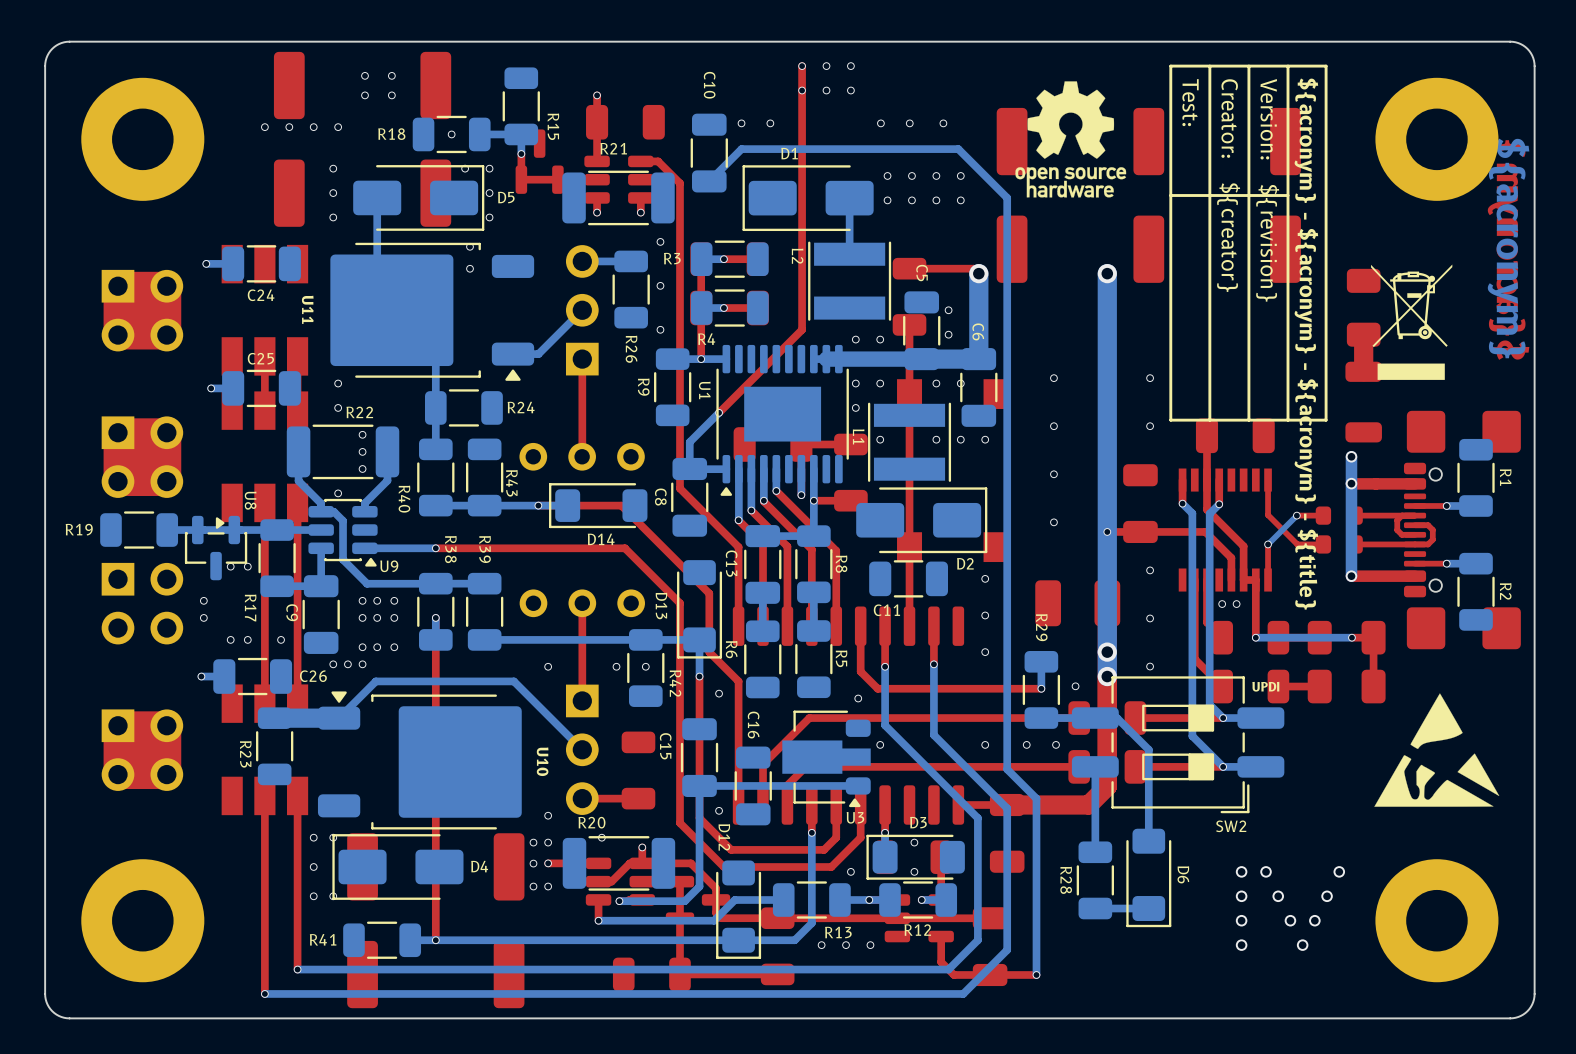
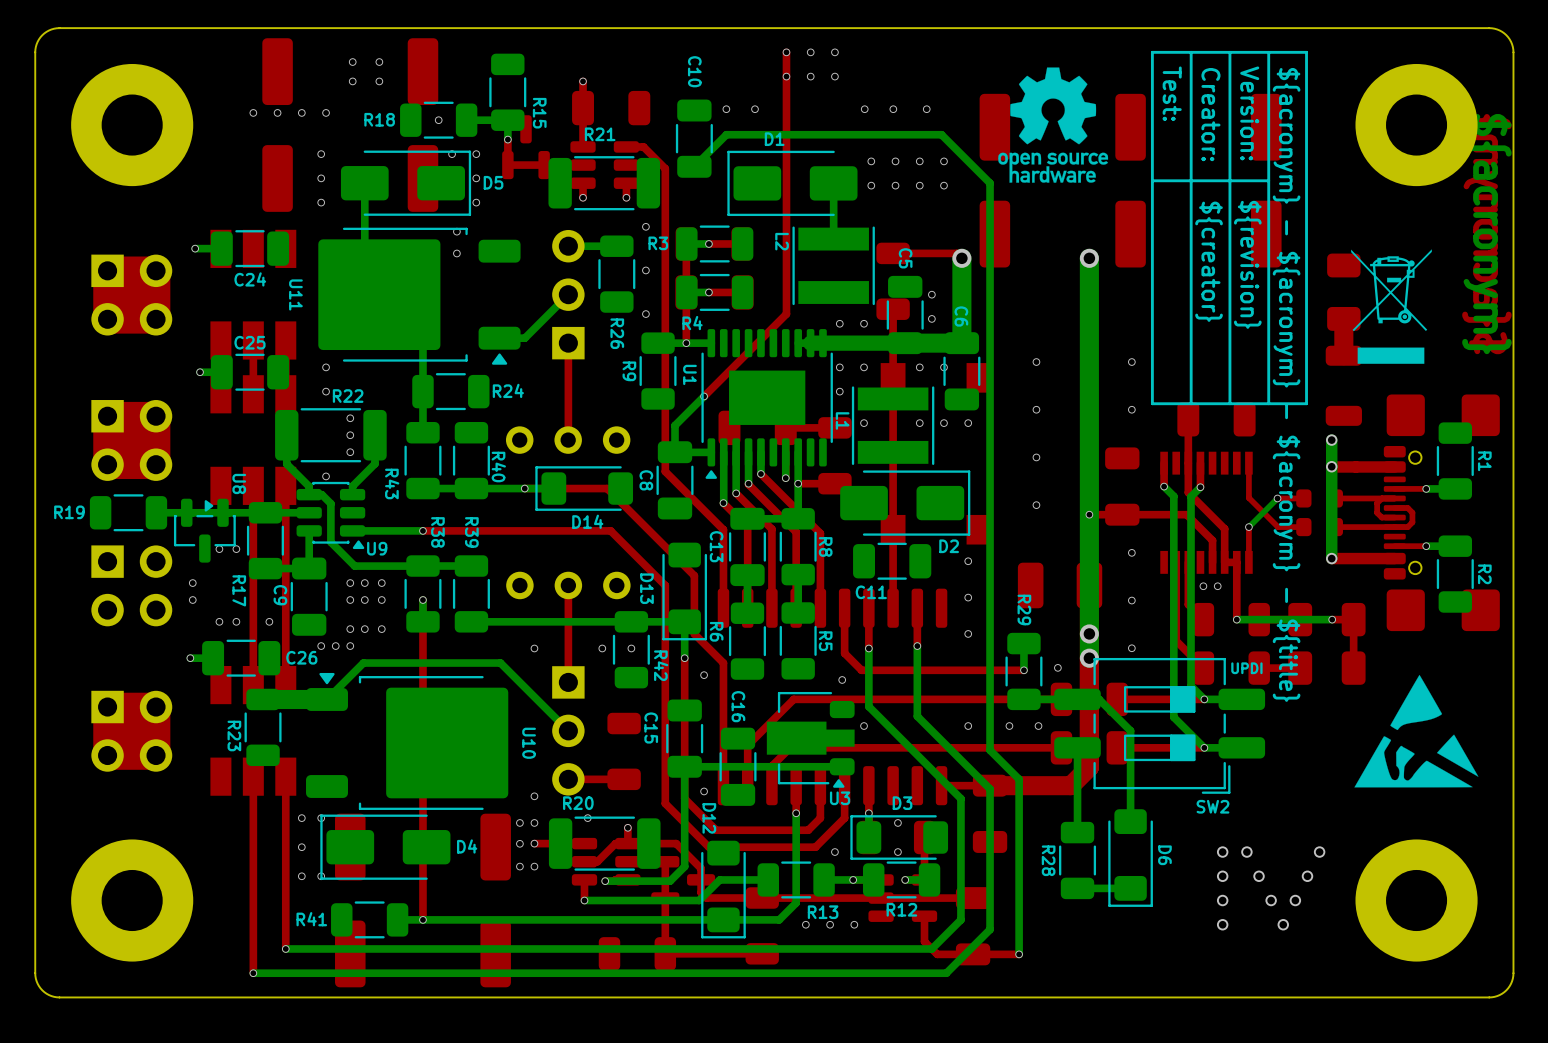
R43 name position: R43 (511, 483) -> R43 (392, 483)
R40 name position: R40 (404, 499) -> R40 (498, 467)

